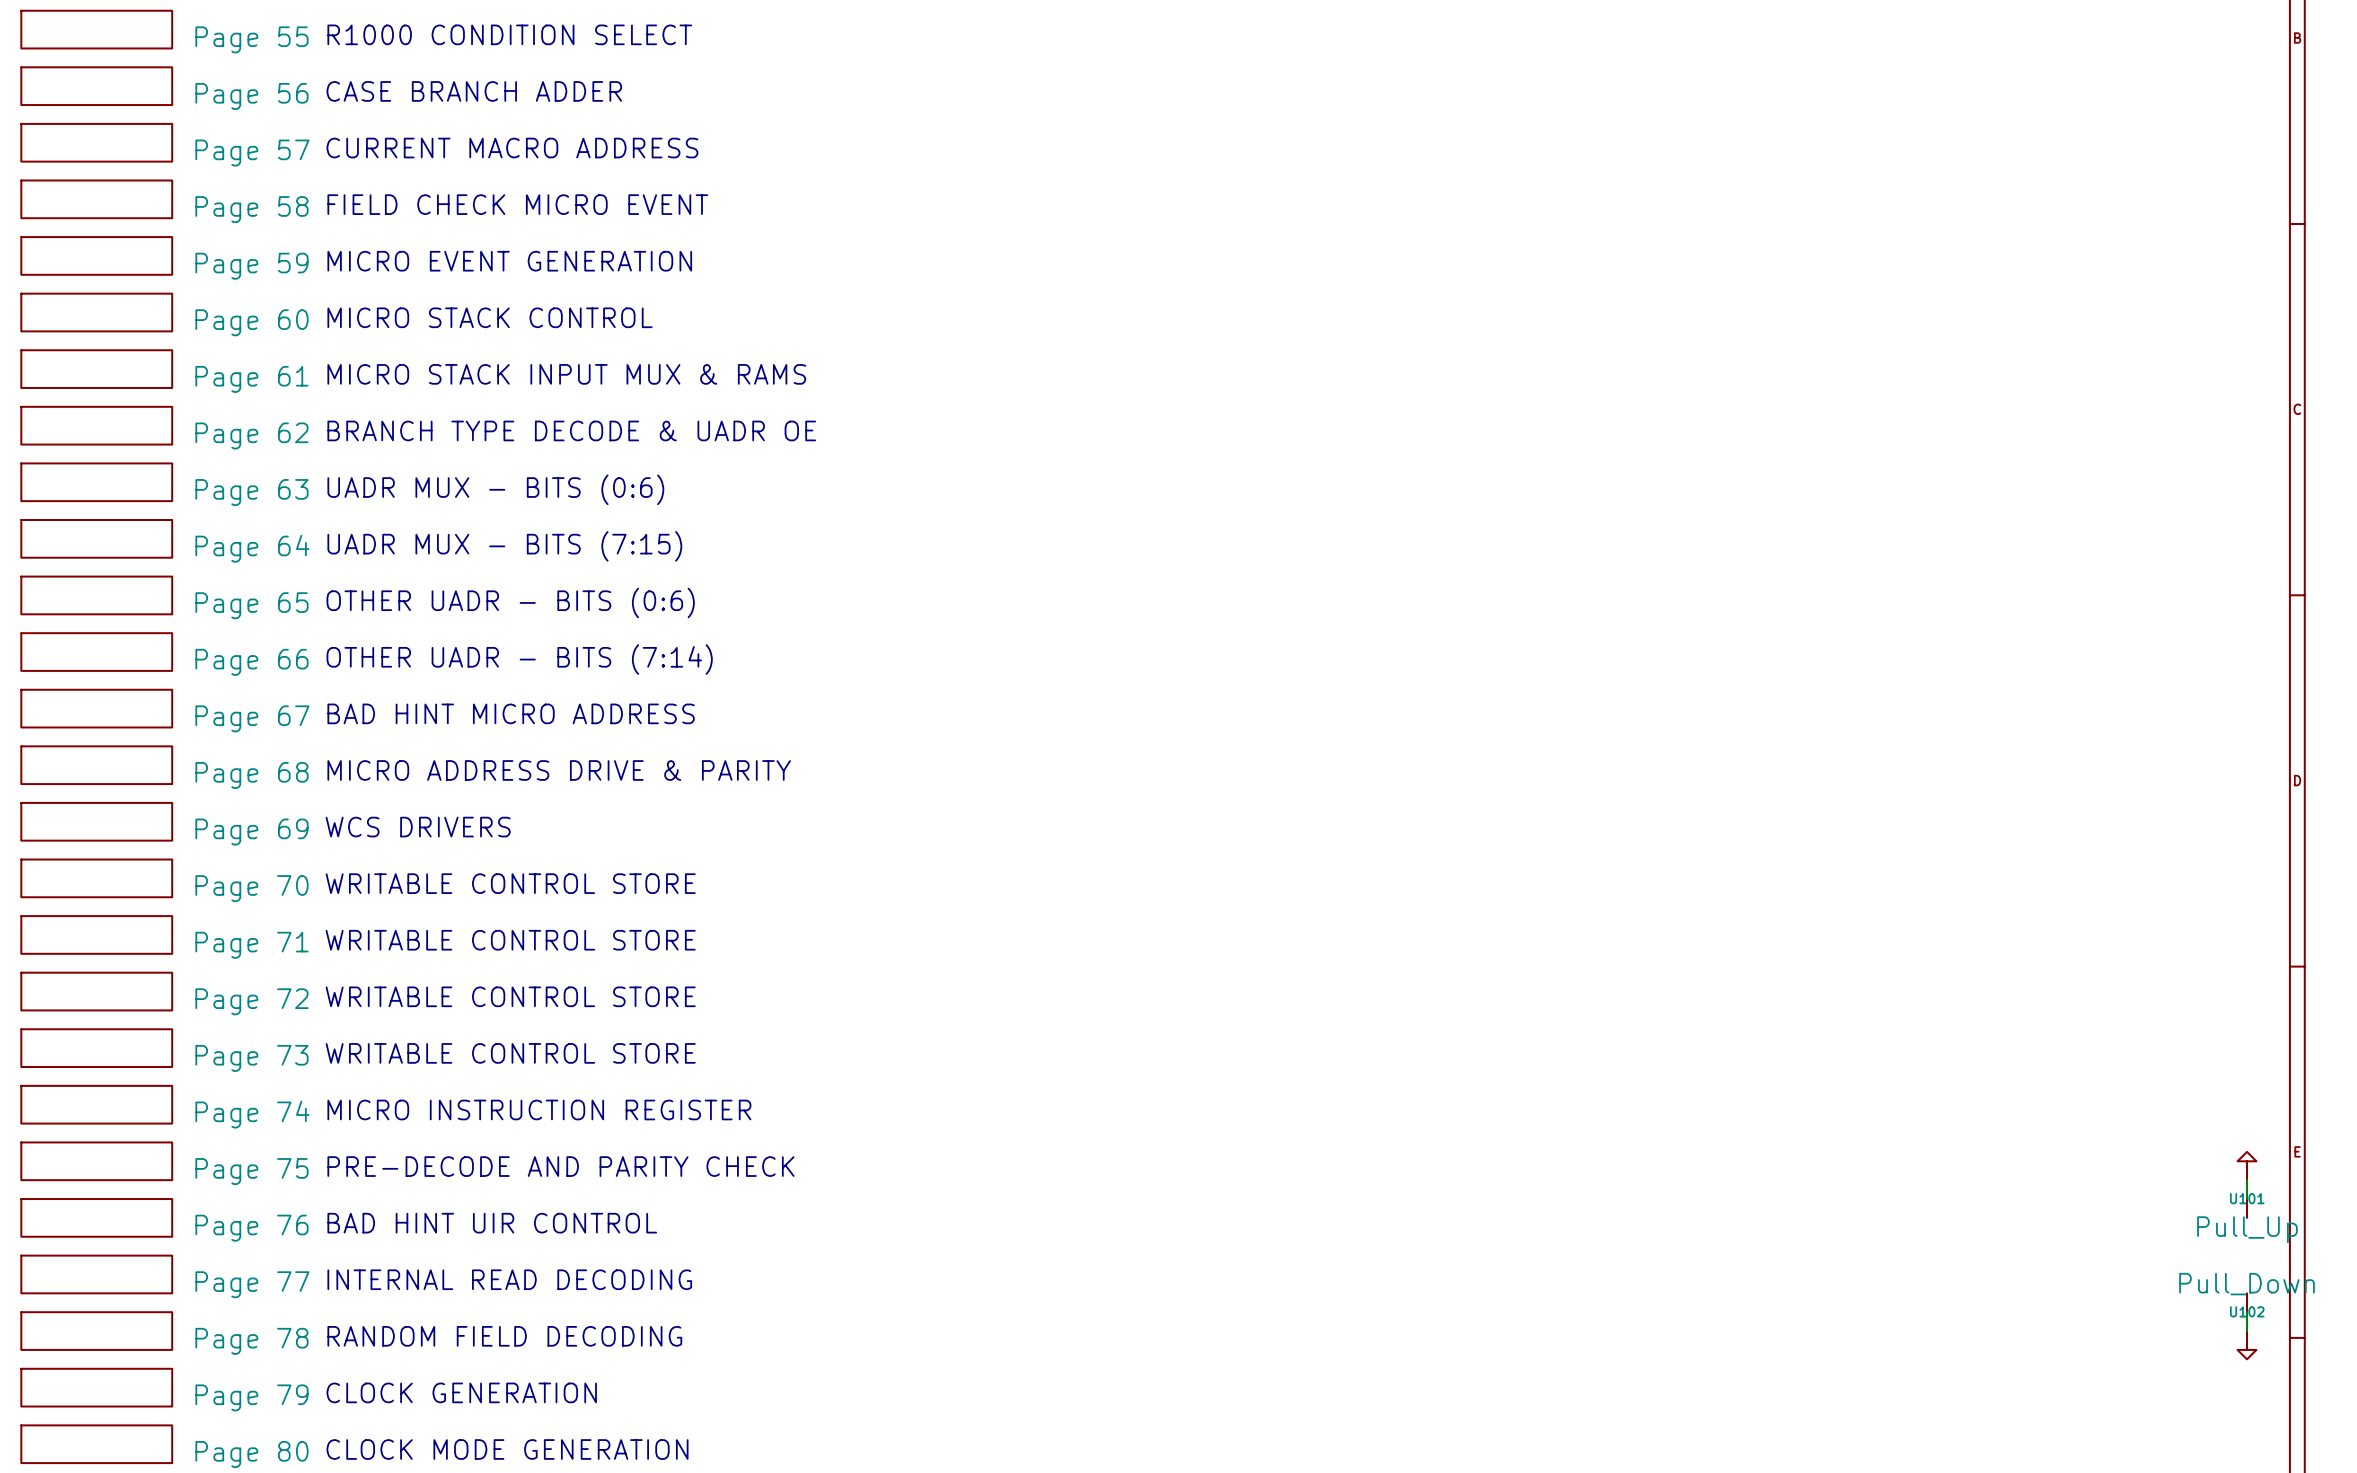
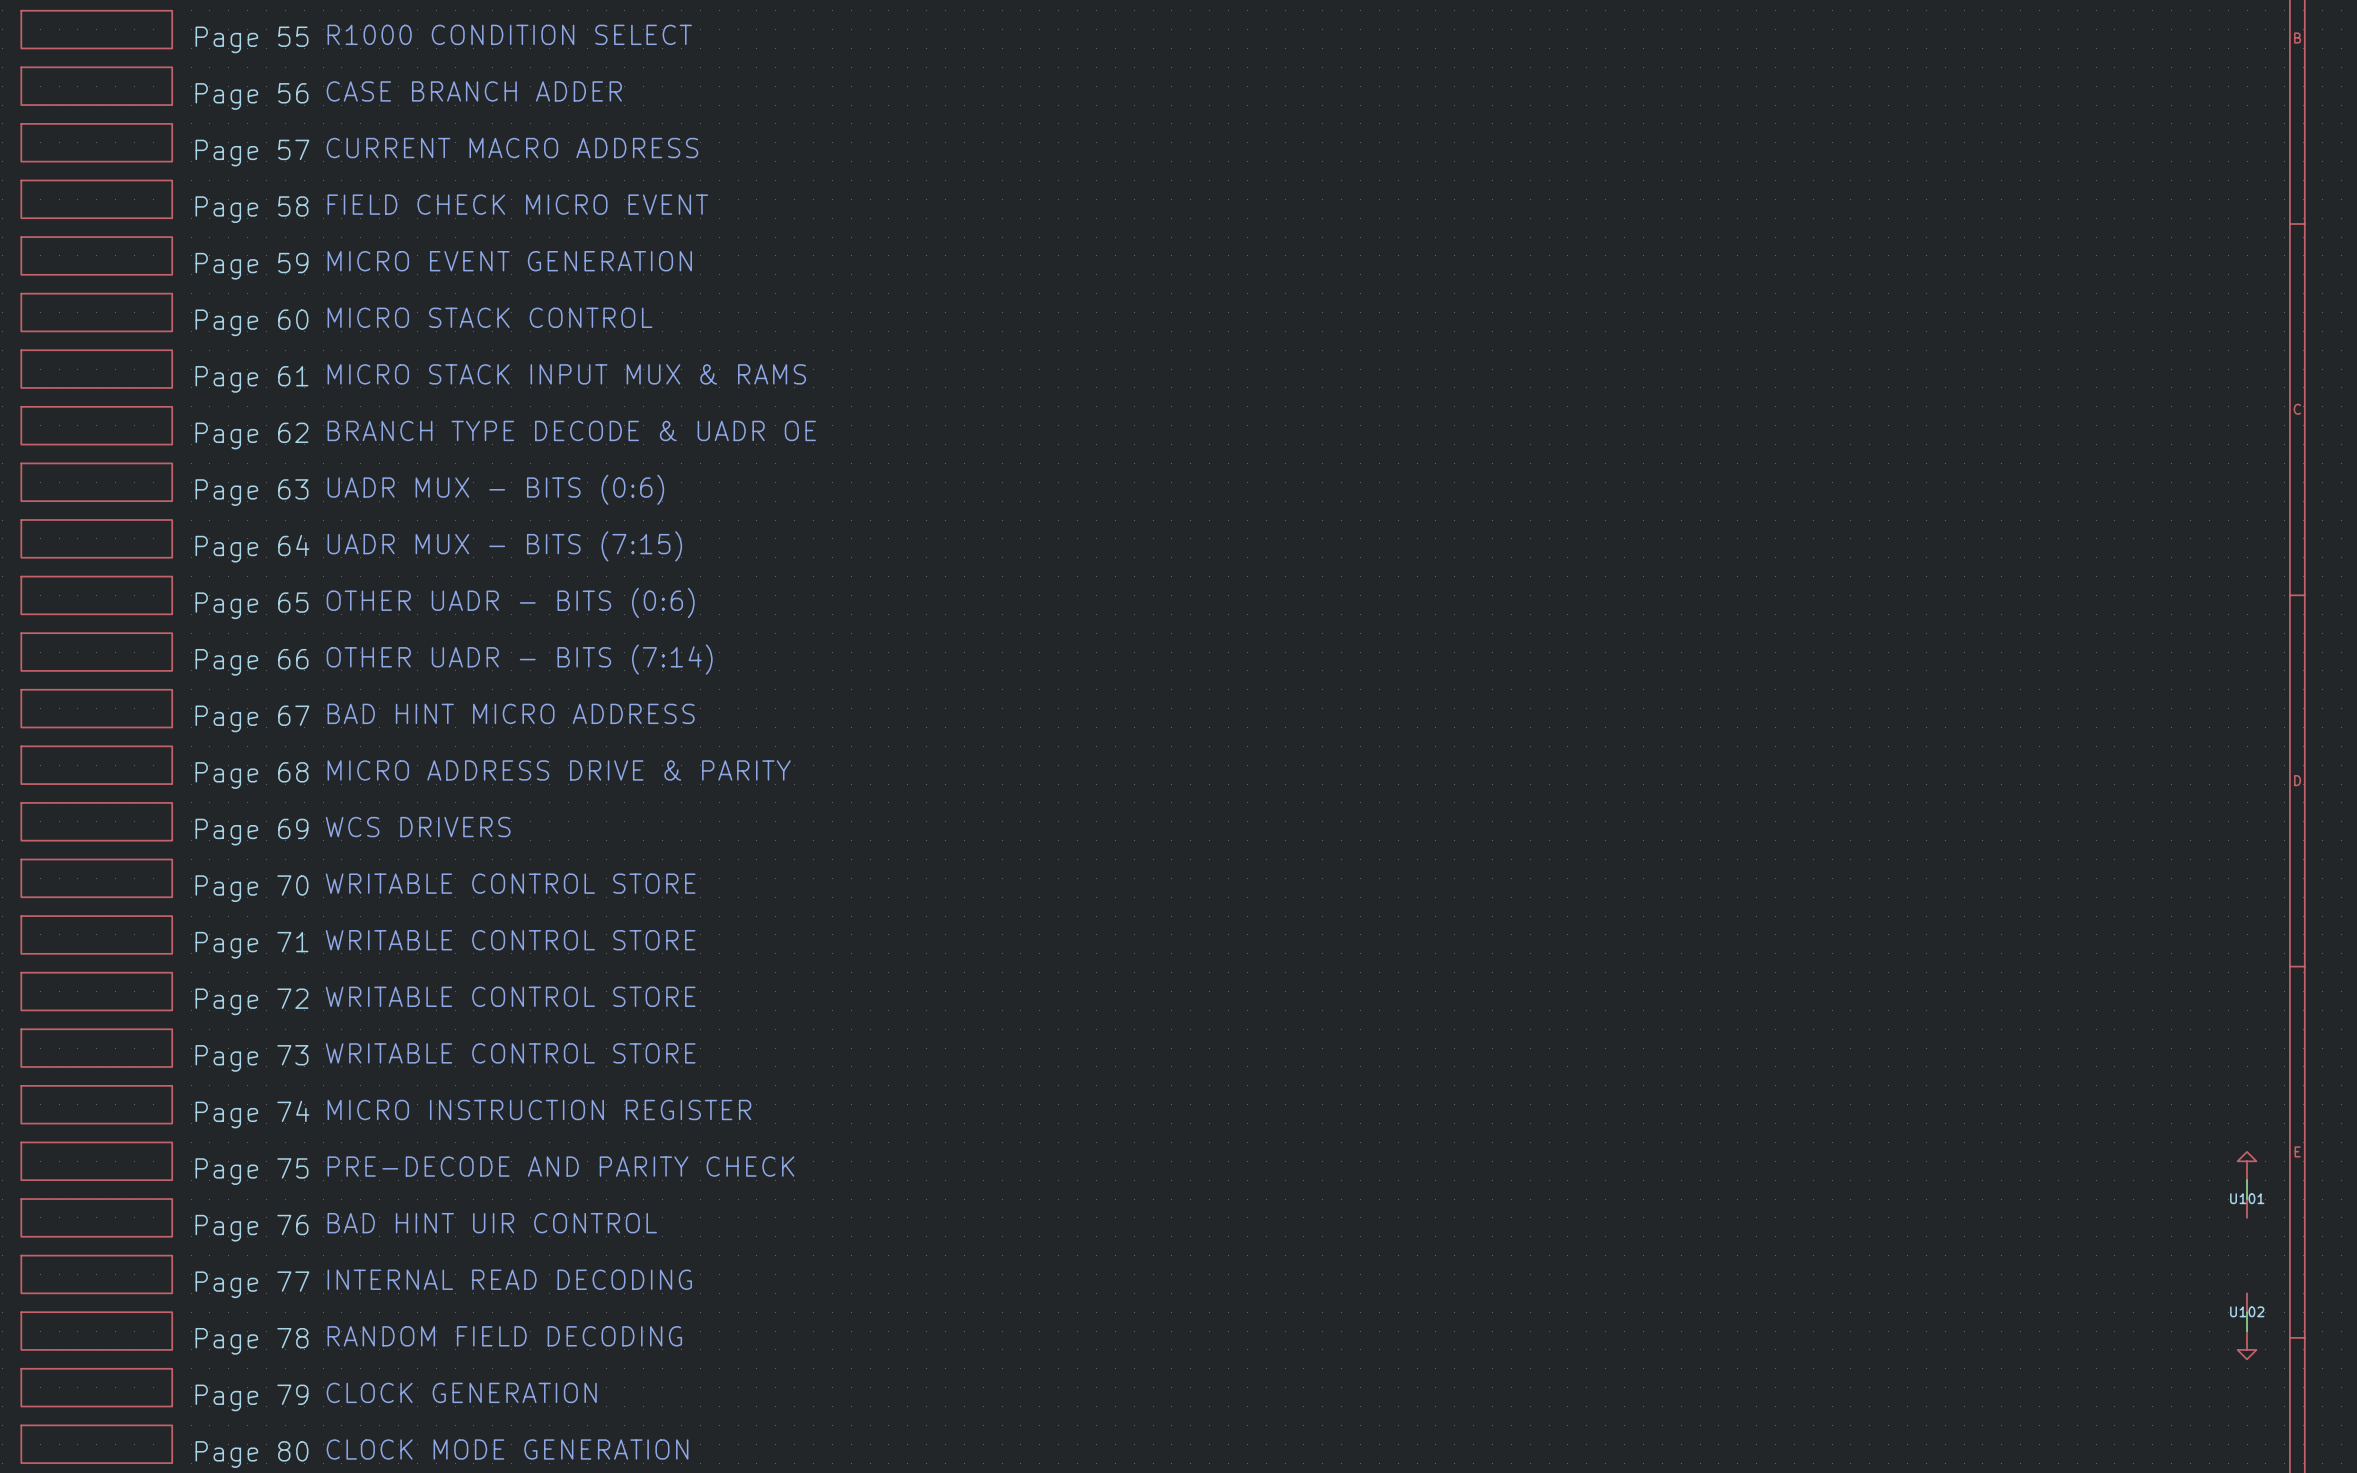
U101 value: Pull_Up (2247, 1229) -> none
U102 value: Pull_Down (2247, 1284) -> none

